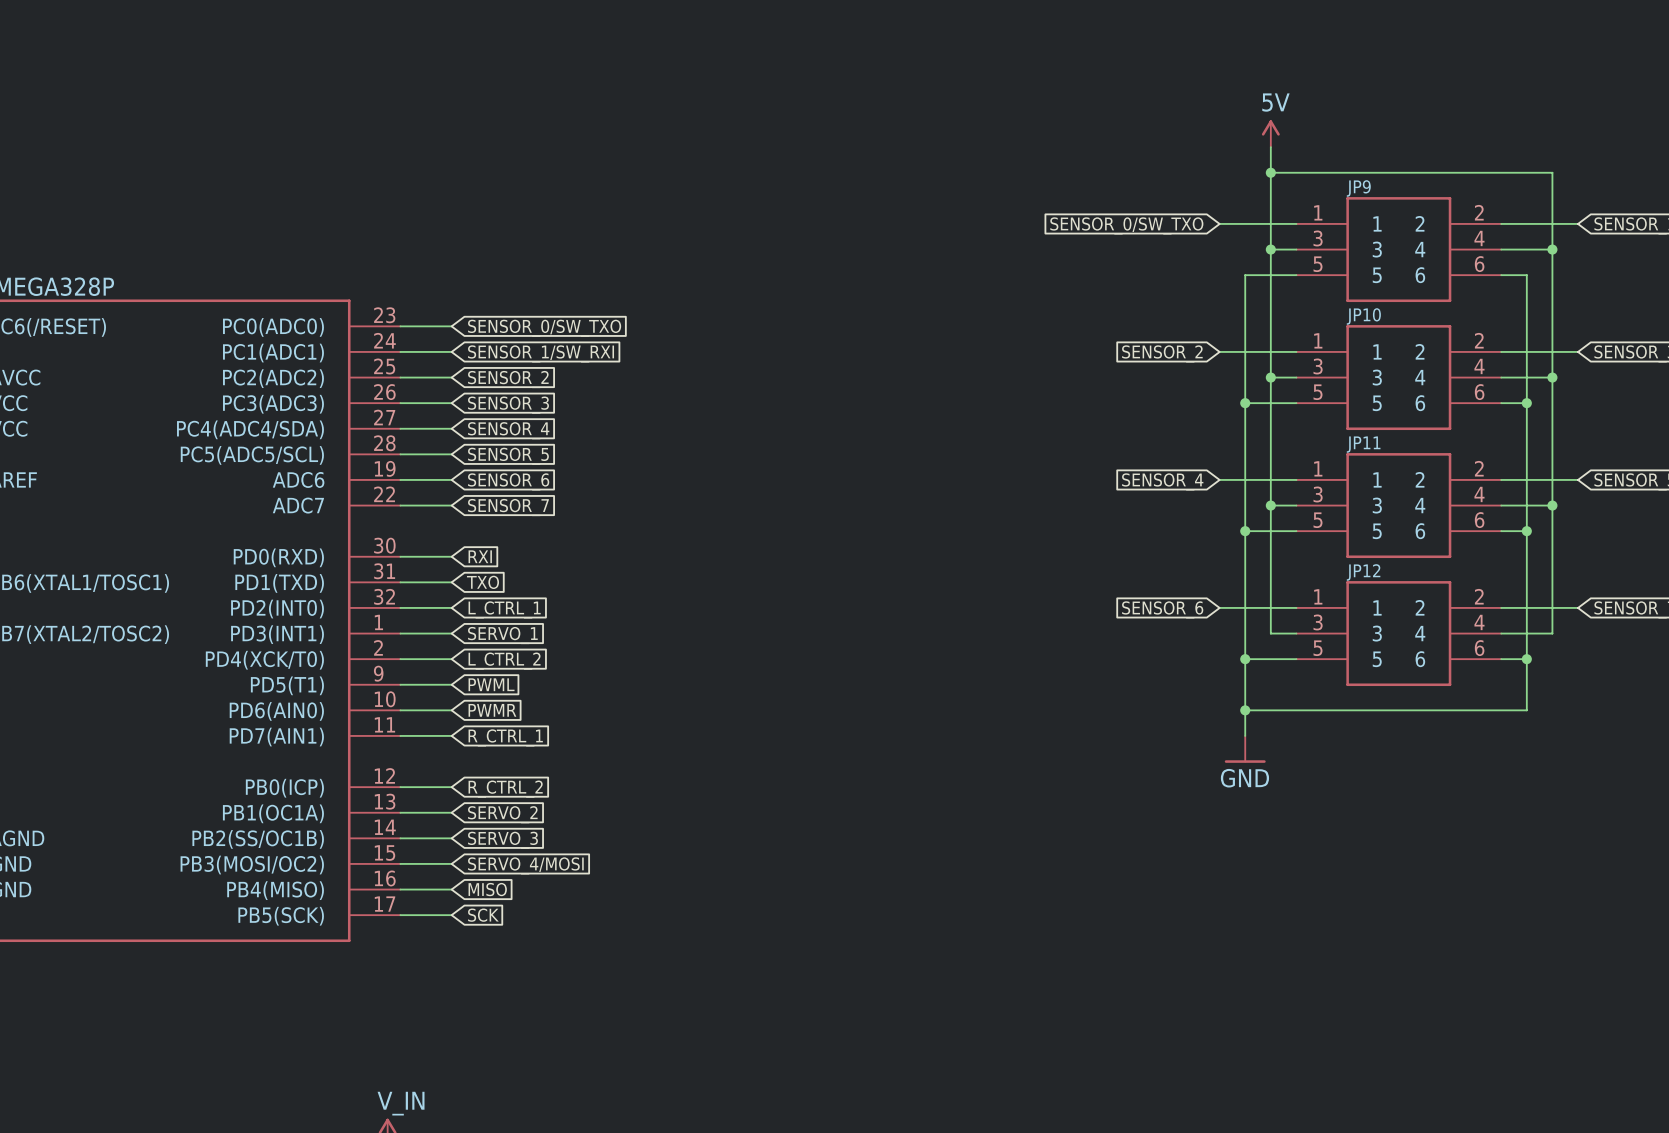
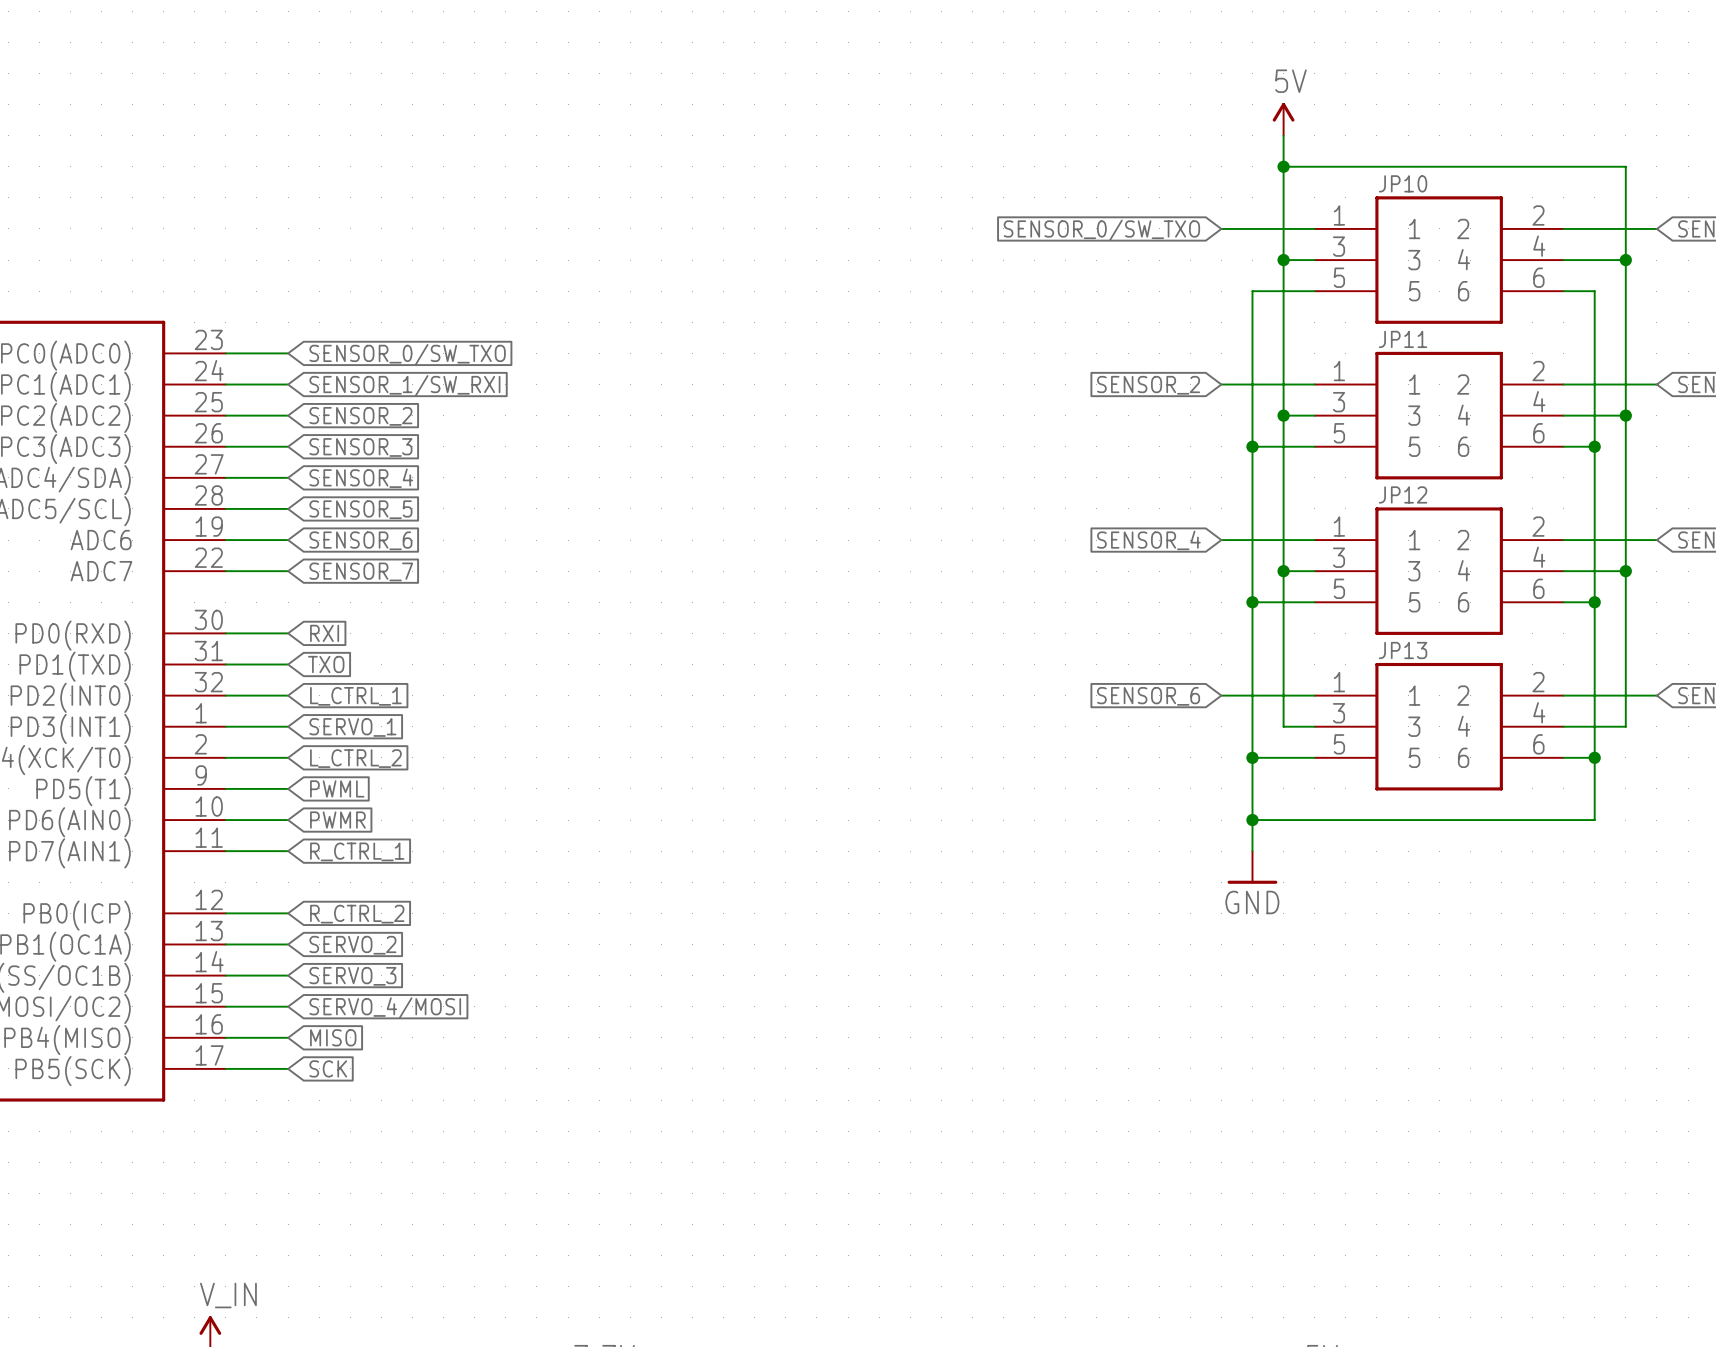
JP9 name: JP9 (1358, 188) -> JP10 (1403, 183)
JP10 name: JP10 (1363, 316) -> JP11 (1403, 339)
JP11 name: JP11 (1363, 444) -> JP12 (1403, 494)
JP12 name: JP12 (1363, 572) -> JP13 (1403, 650)

